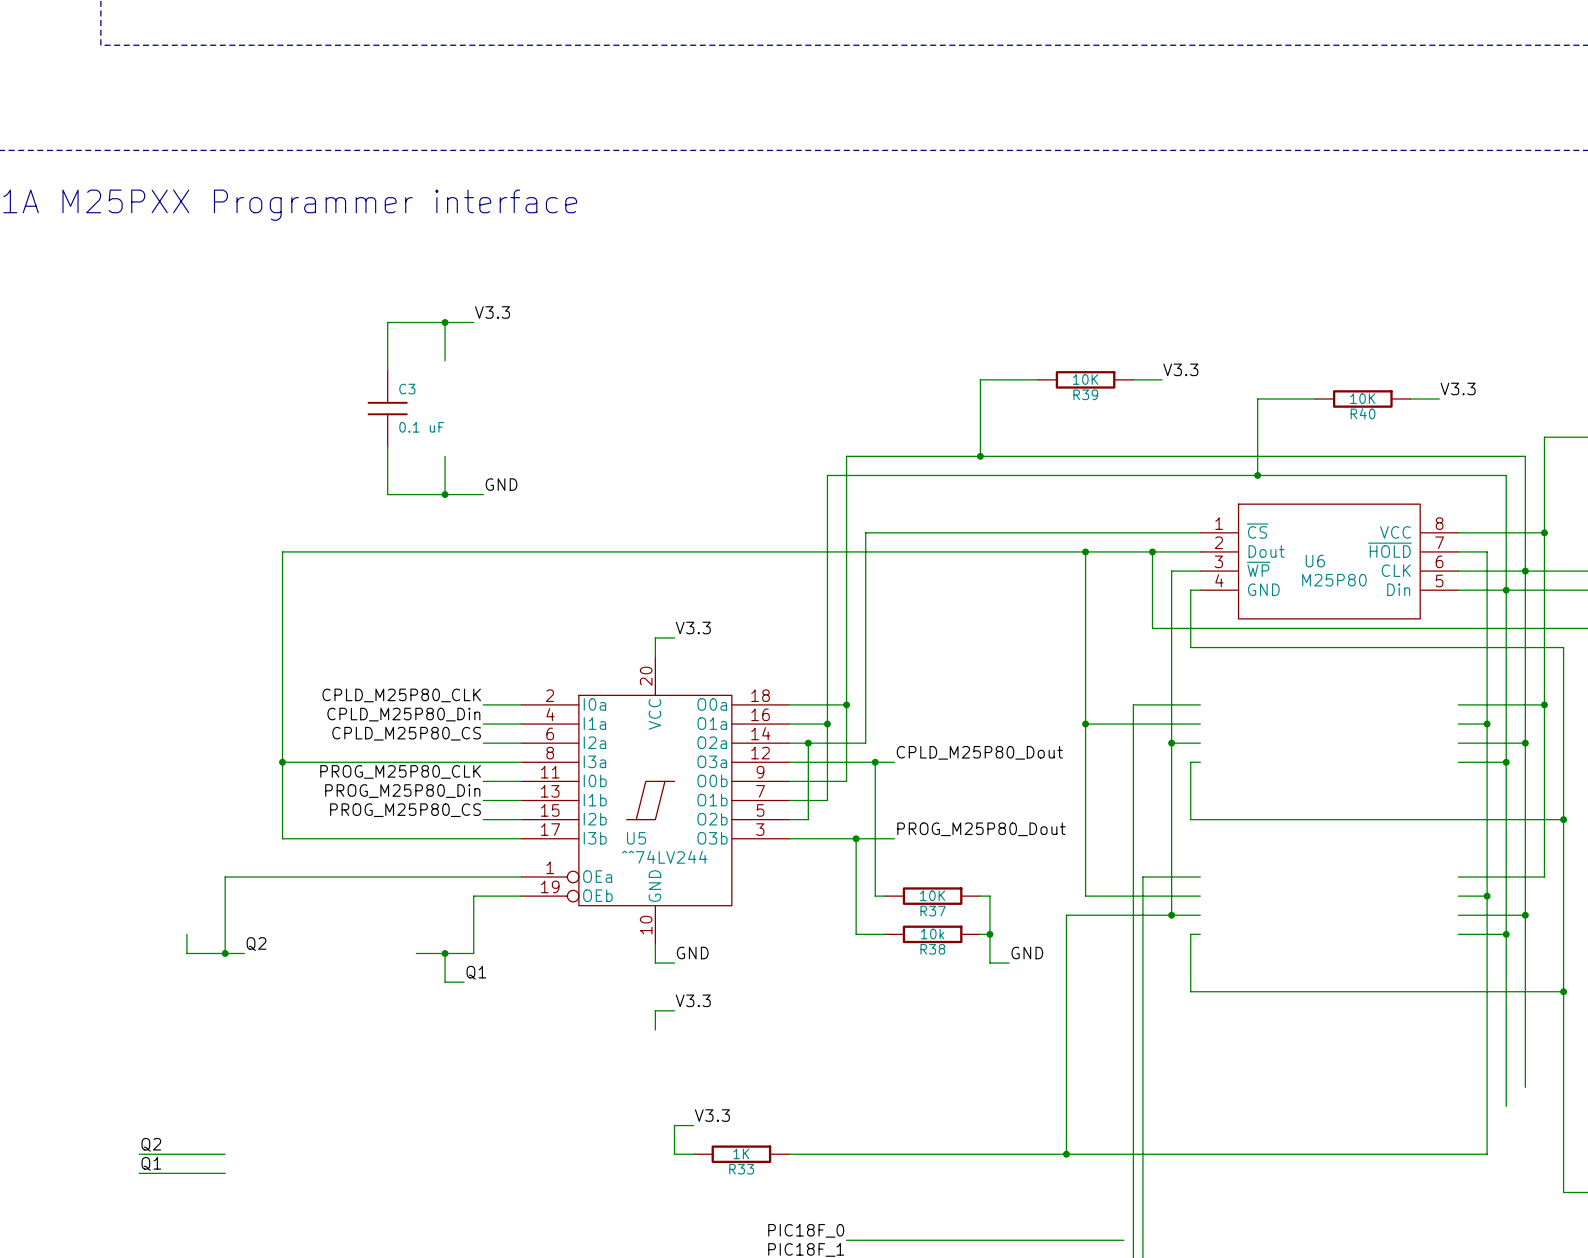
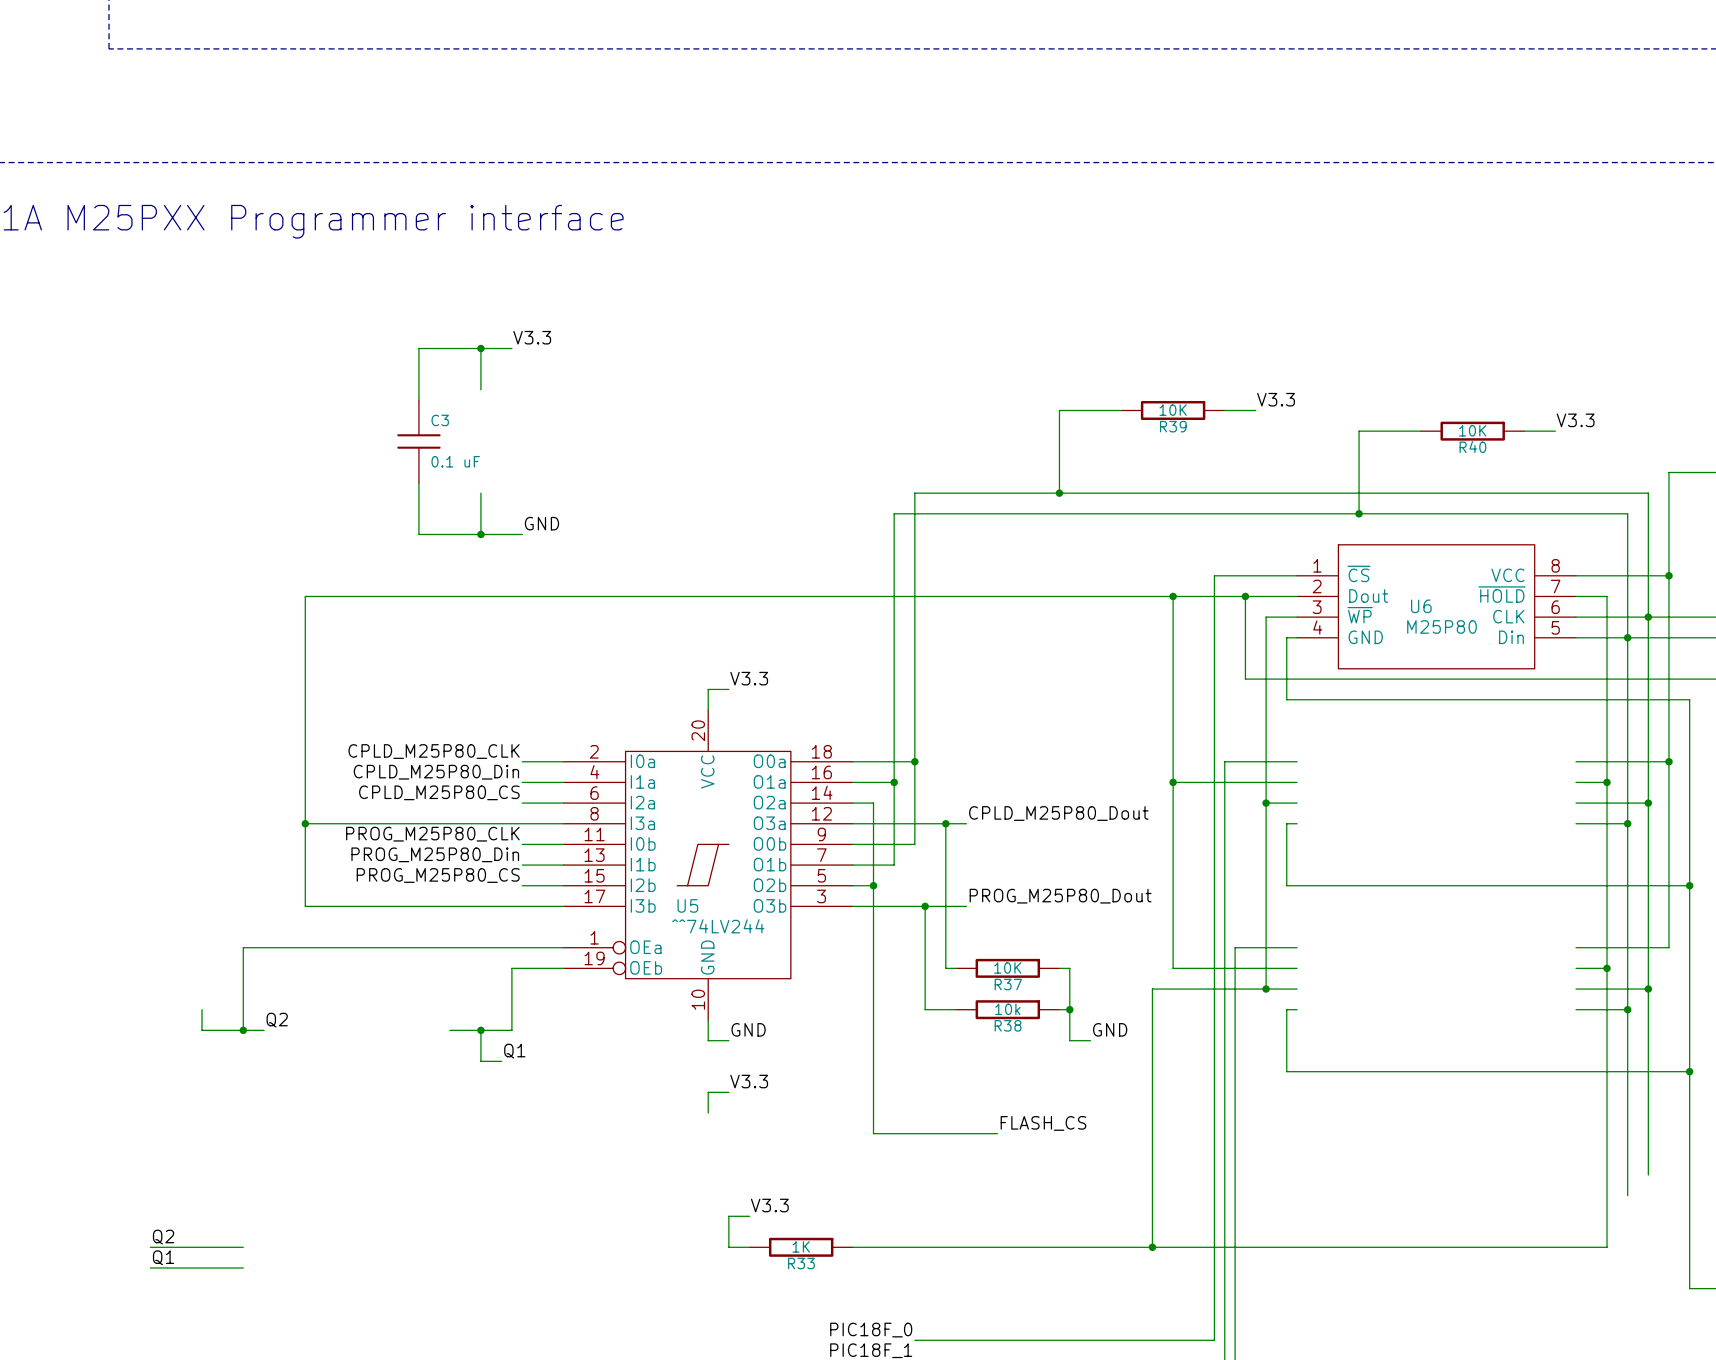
wire: (1123, 532) (865, 532) (865, 743) (808, 743) -> (1214, 575) (1214, 1340)
junction: (808, 743) -> none
wire: none -> (873, 885) (873, 1133) (997, 1133)
junction: none -> (873, 885)
label: none -> FLASH_CS (1043, 1123)

